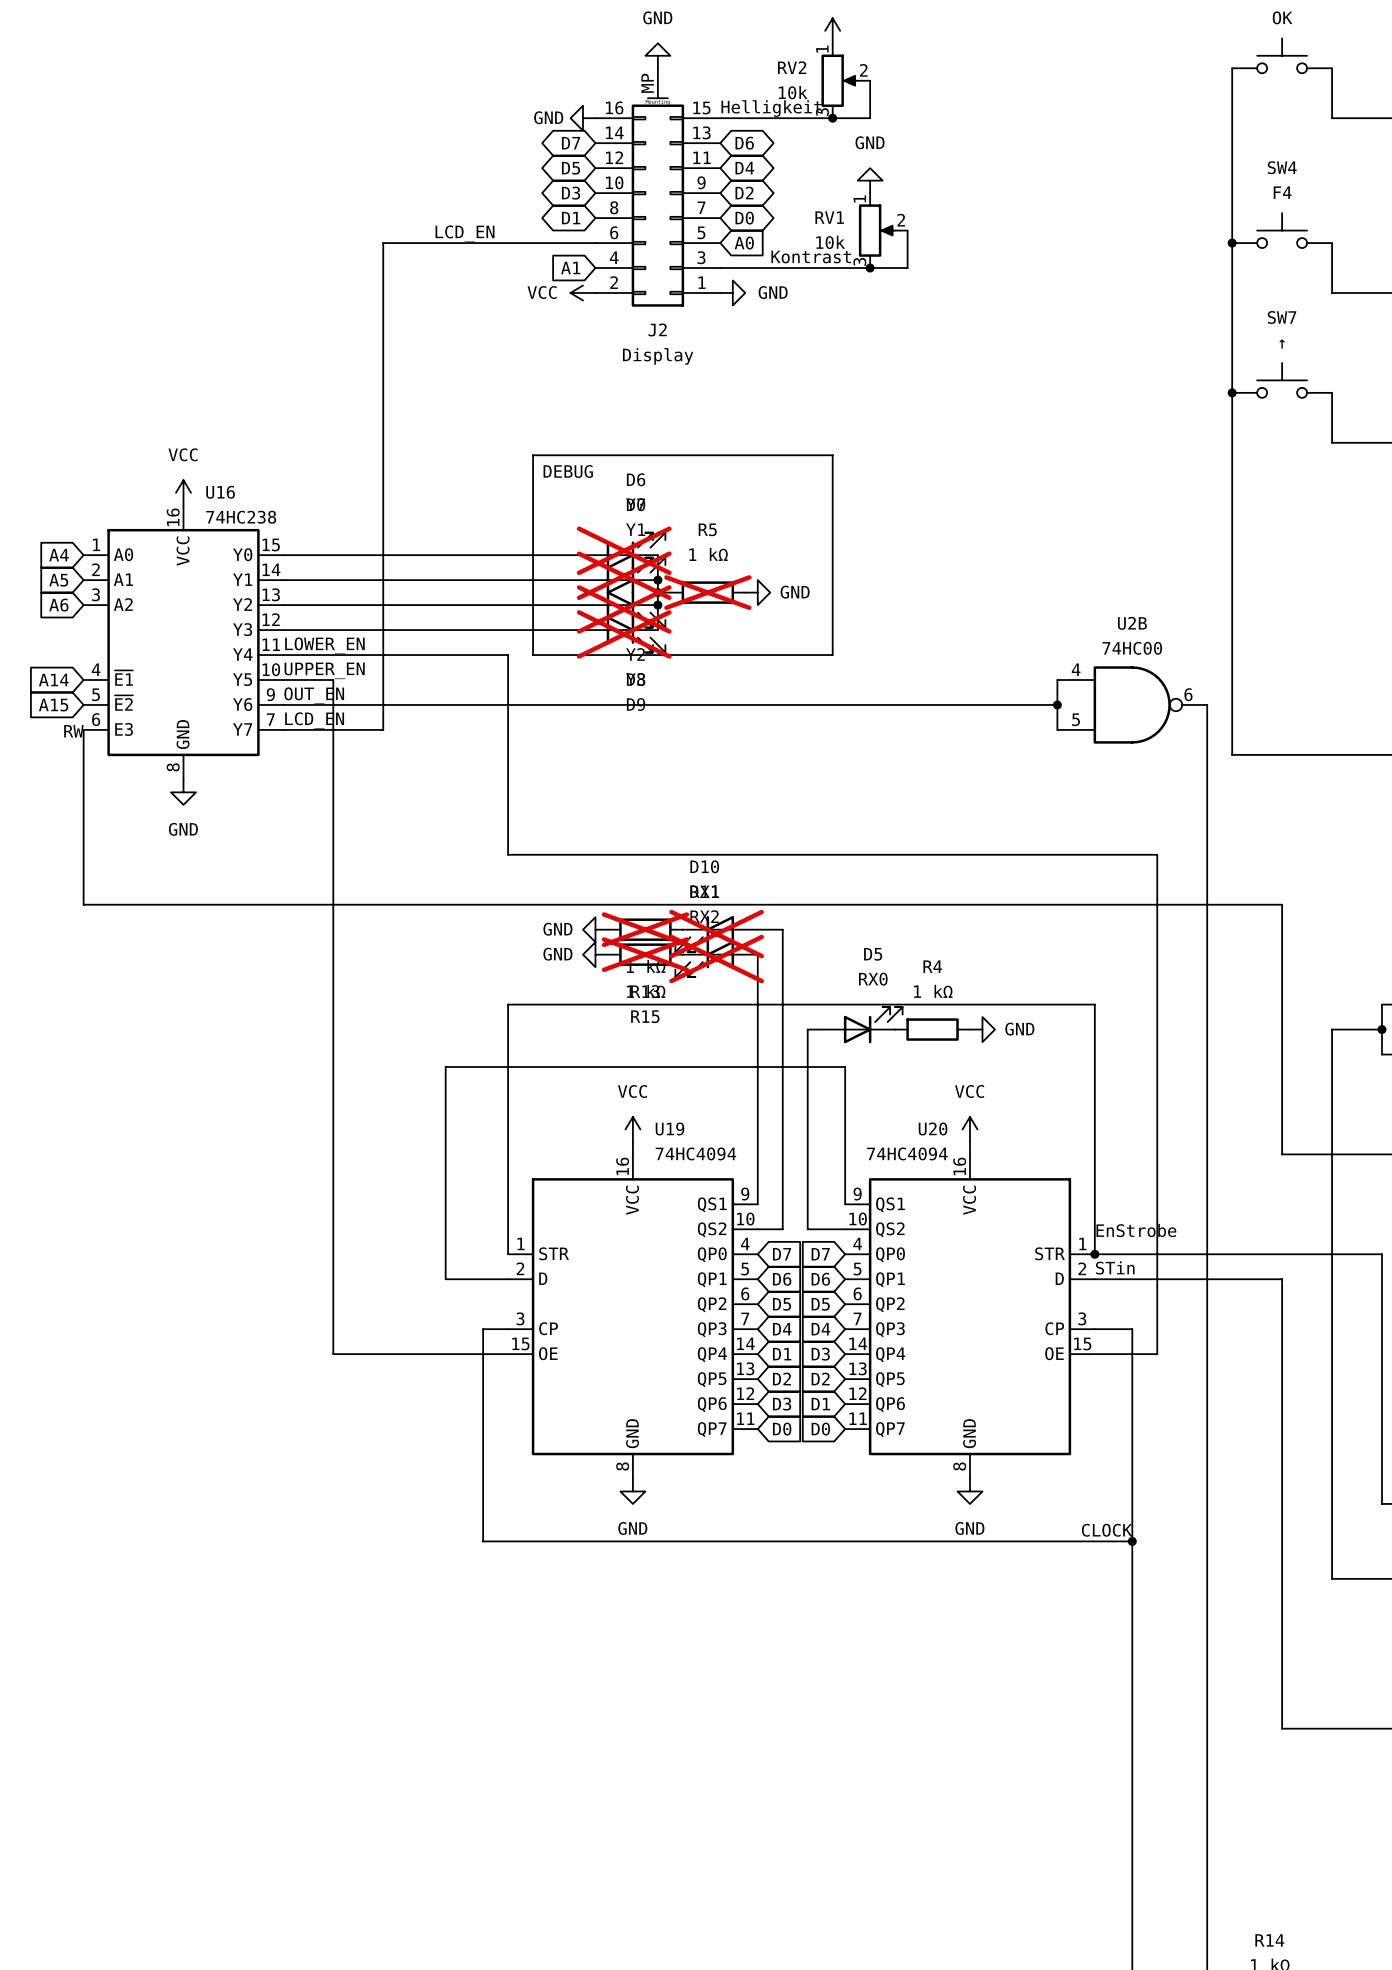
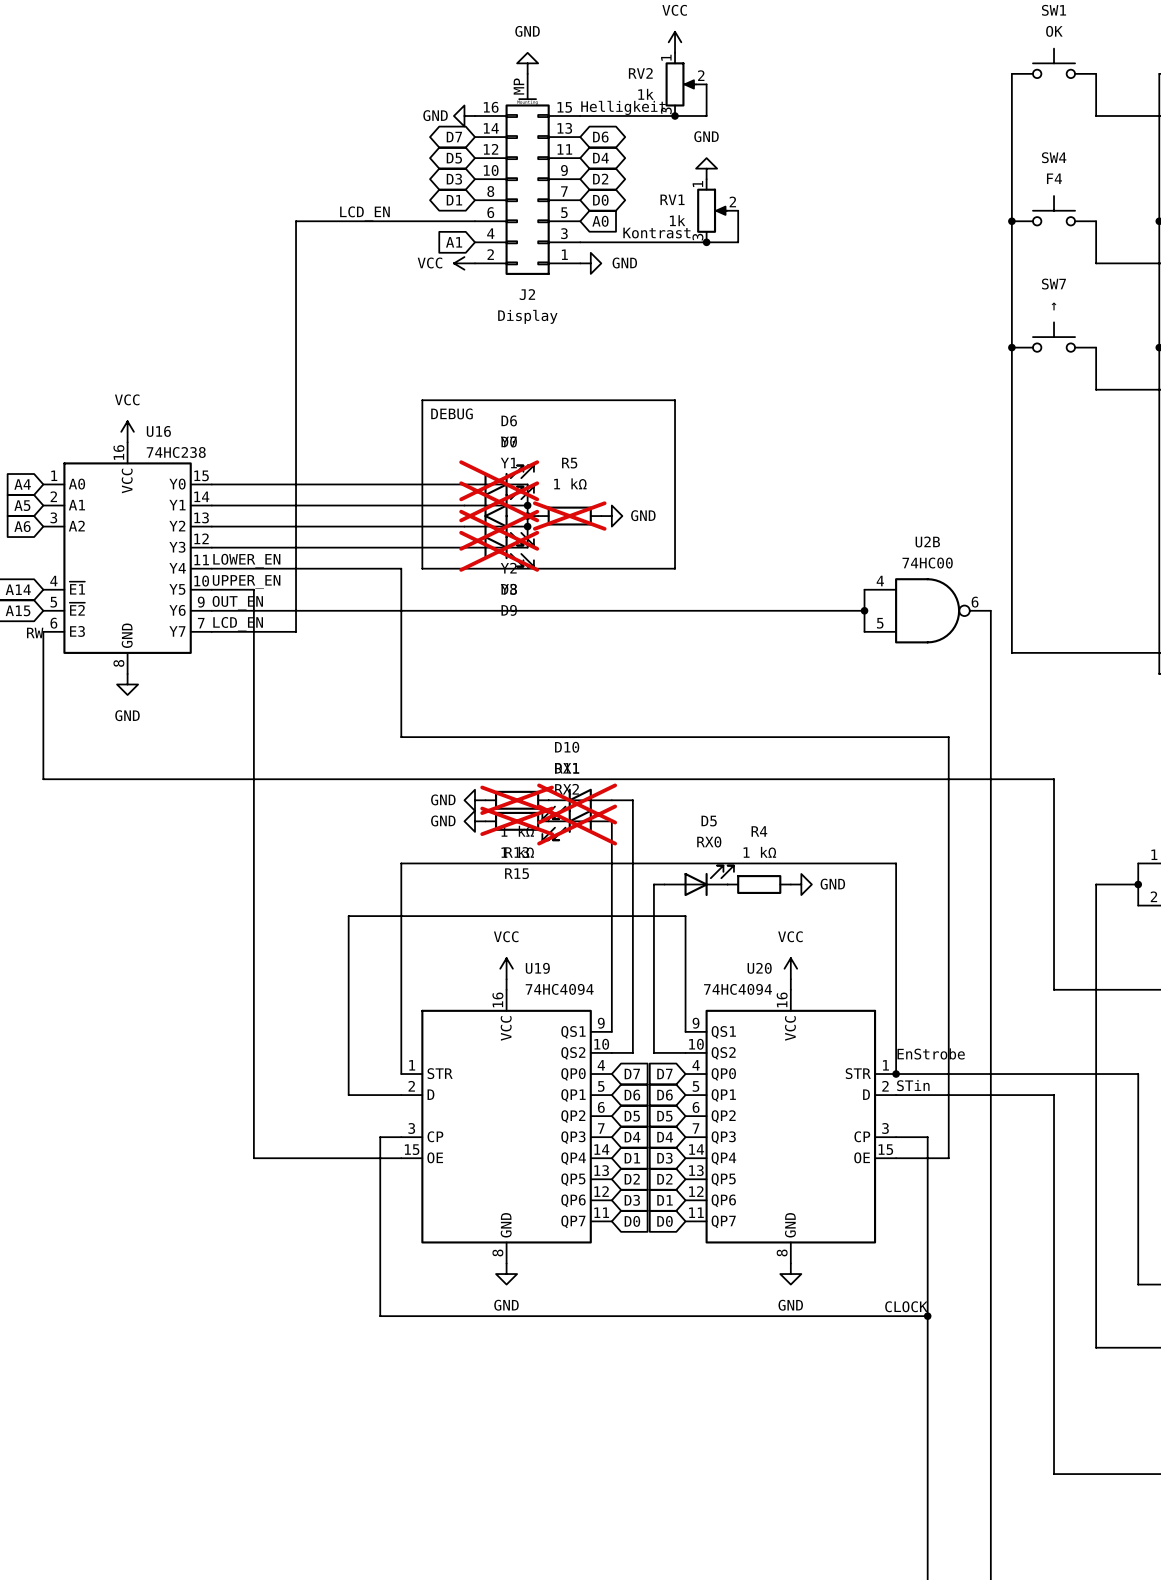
RV2 value: 10k (793, 92) -> 1k (646, 94)
RV1 value: 10k (830, 242) -> 1k (677, 220)

